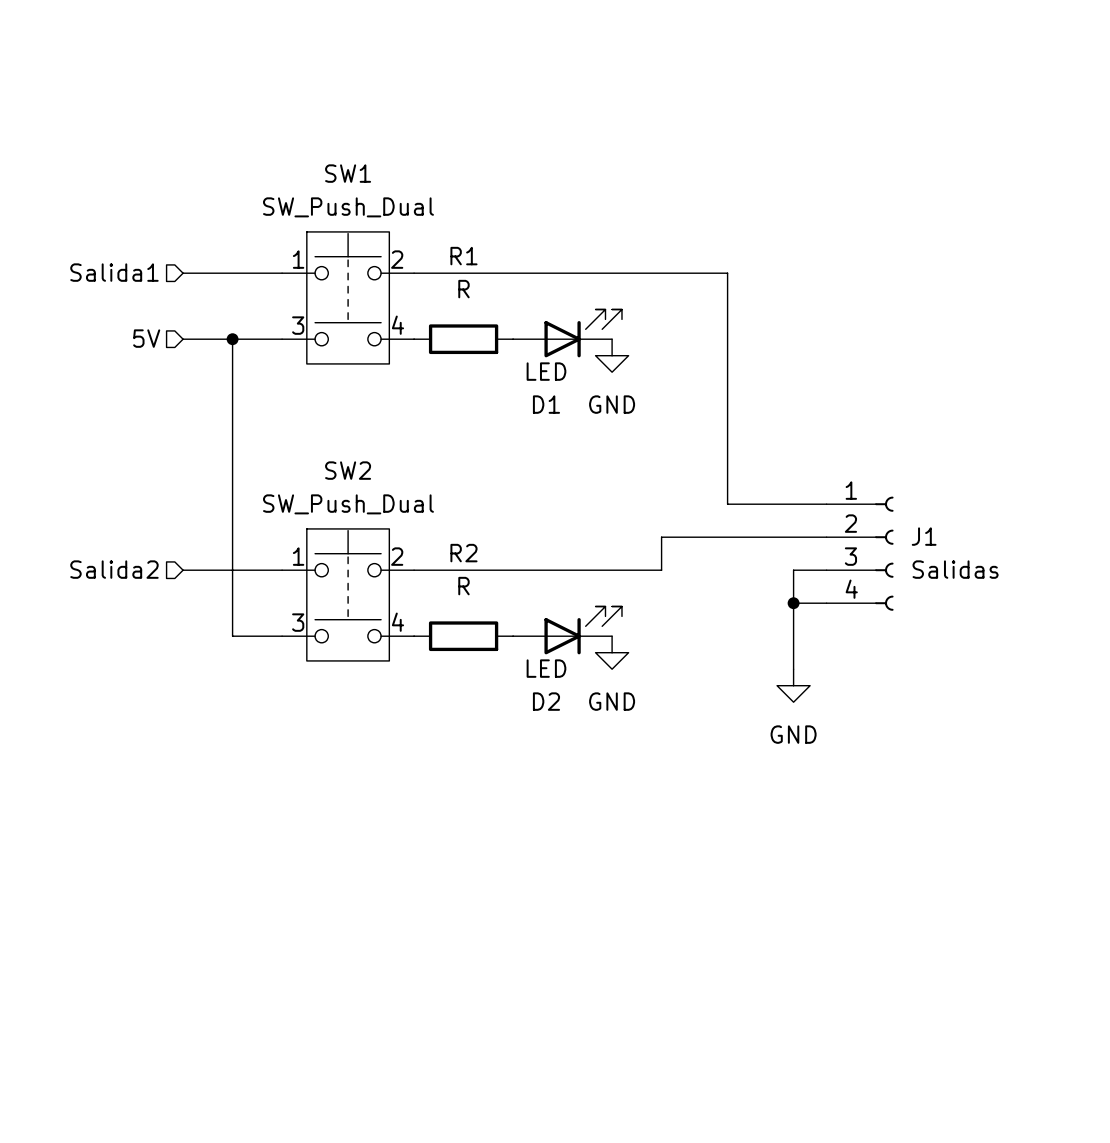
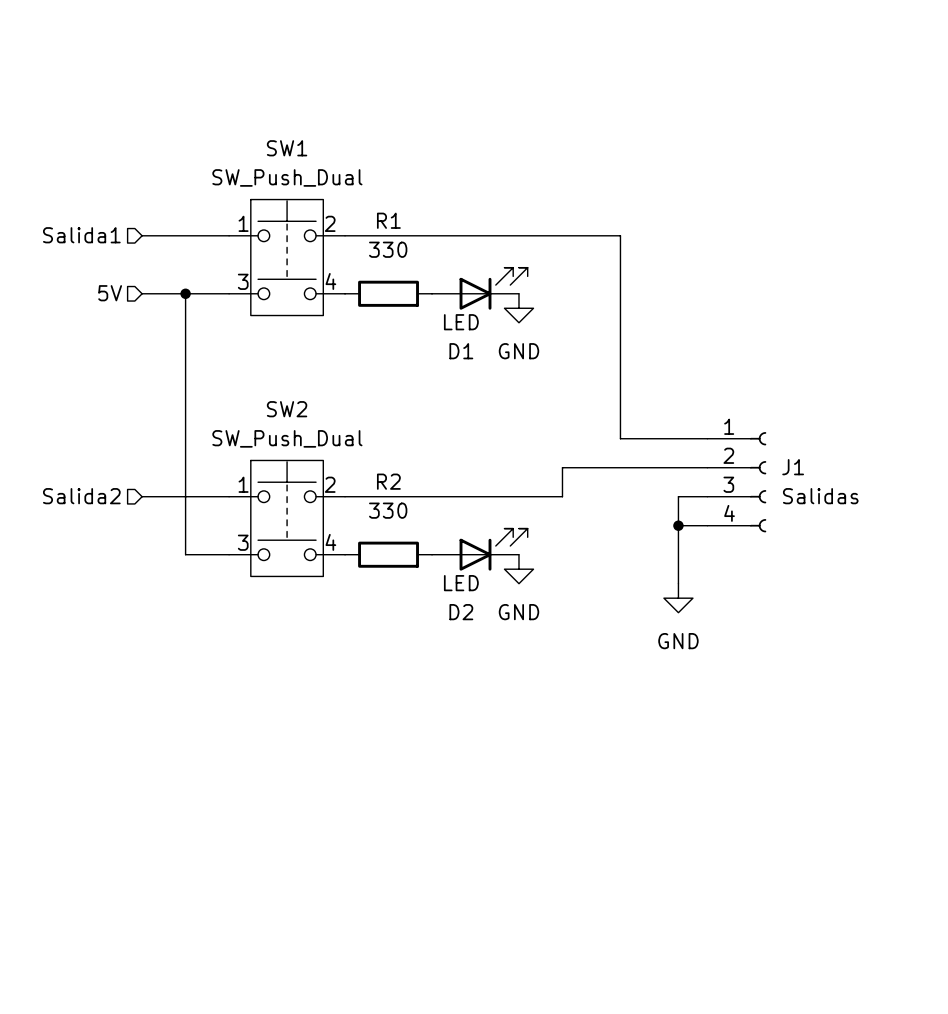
R1 value: R (463, 289) -> 330 (388, 249)
R2 value: R (463, 586) -> 330 (388, 510)

